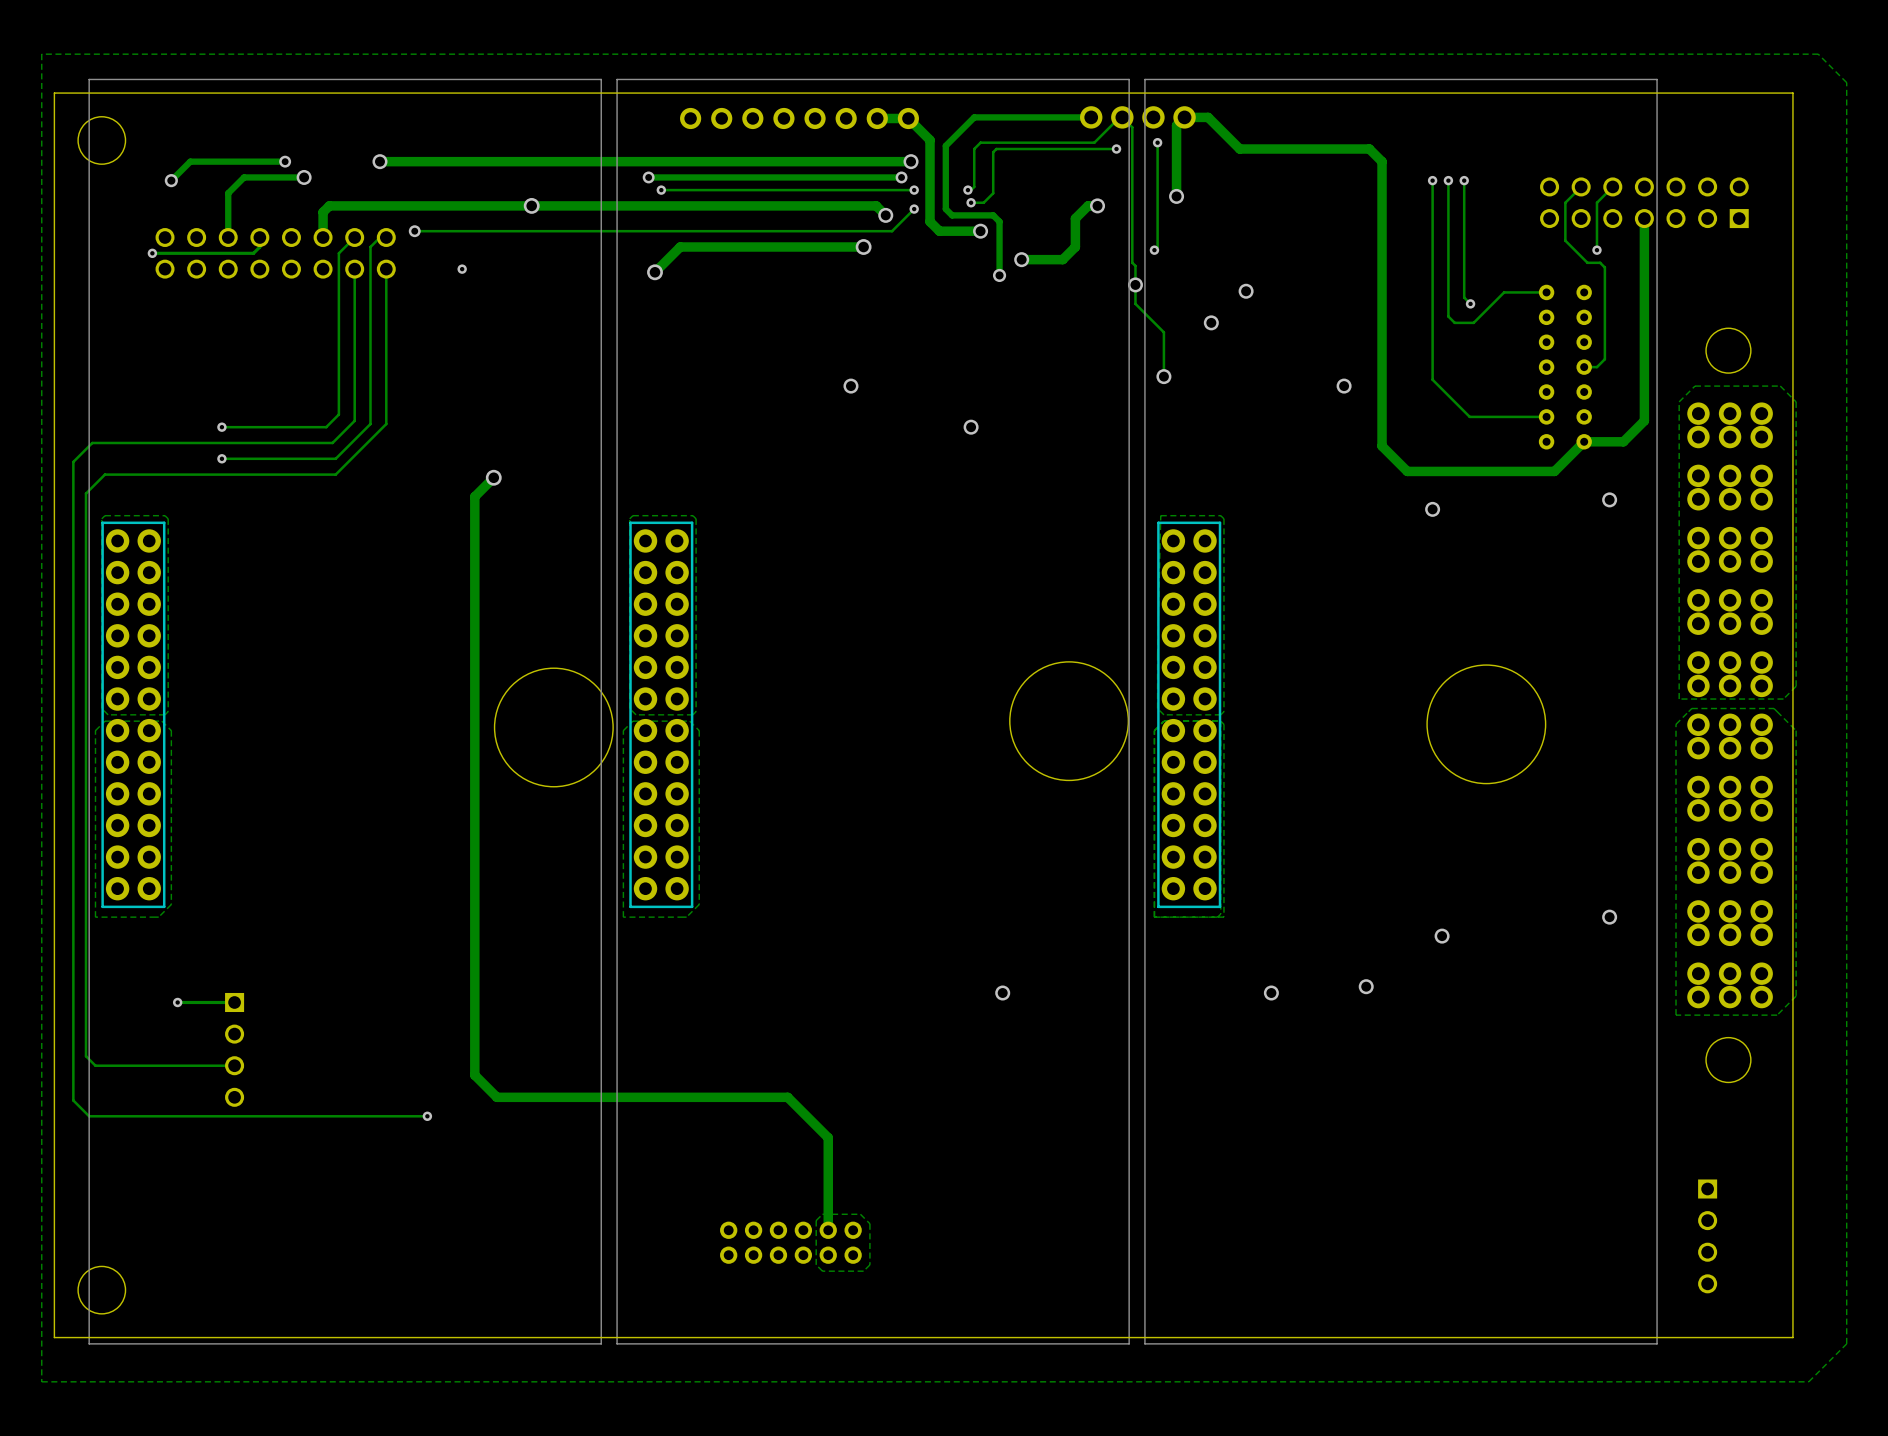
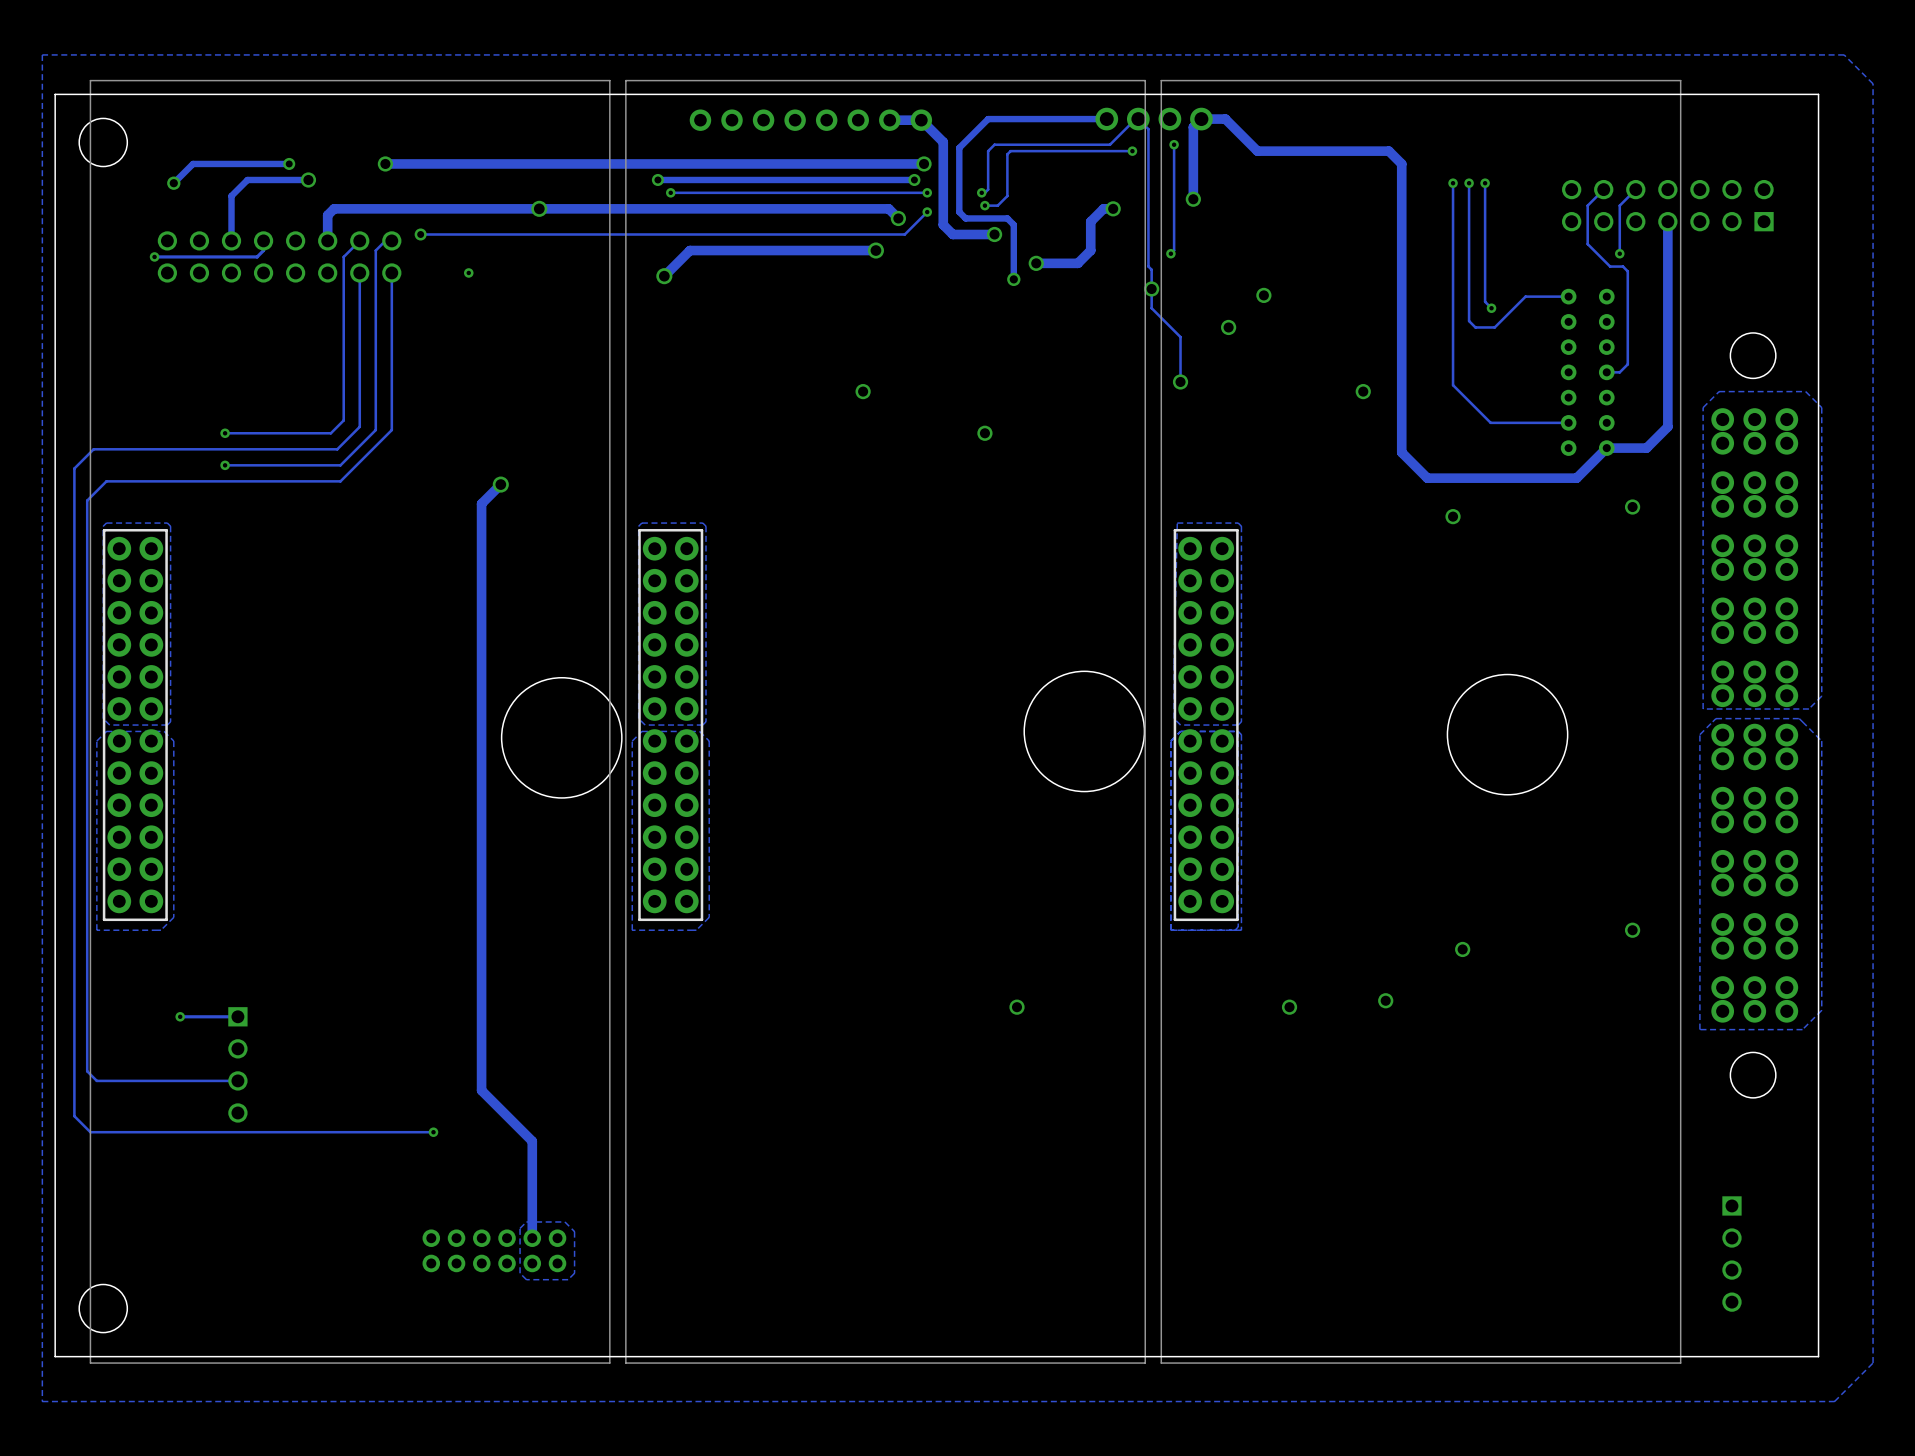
track: (496, 1097) (787, 1097) (828, 1137) (828, 1230) -> (504, 1112) (532, 1141) (532, 1238)
zone outline: (860, 1214) (869, 1223) (869, 1264) (863, 1271) (822, 1271) (816, 1264) (816, 1220) (822, 1214) (860, 1214) -> (564, 1221) (574, 1231) (574, 1273) (568, 1279) (526, 1279) (520, 1273) (520, 1228) (526, 1221) (564, 1221)
part position: (790, 1242) -> (494, 1250)

